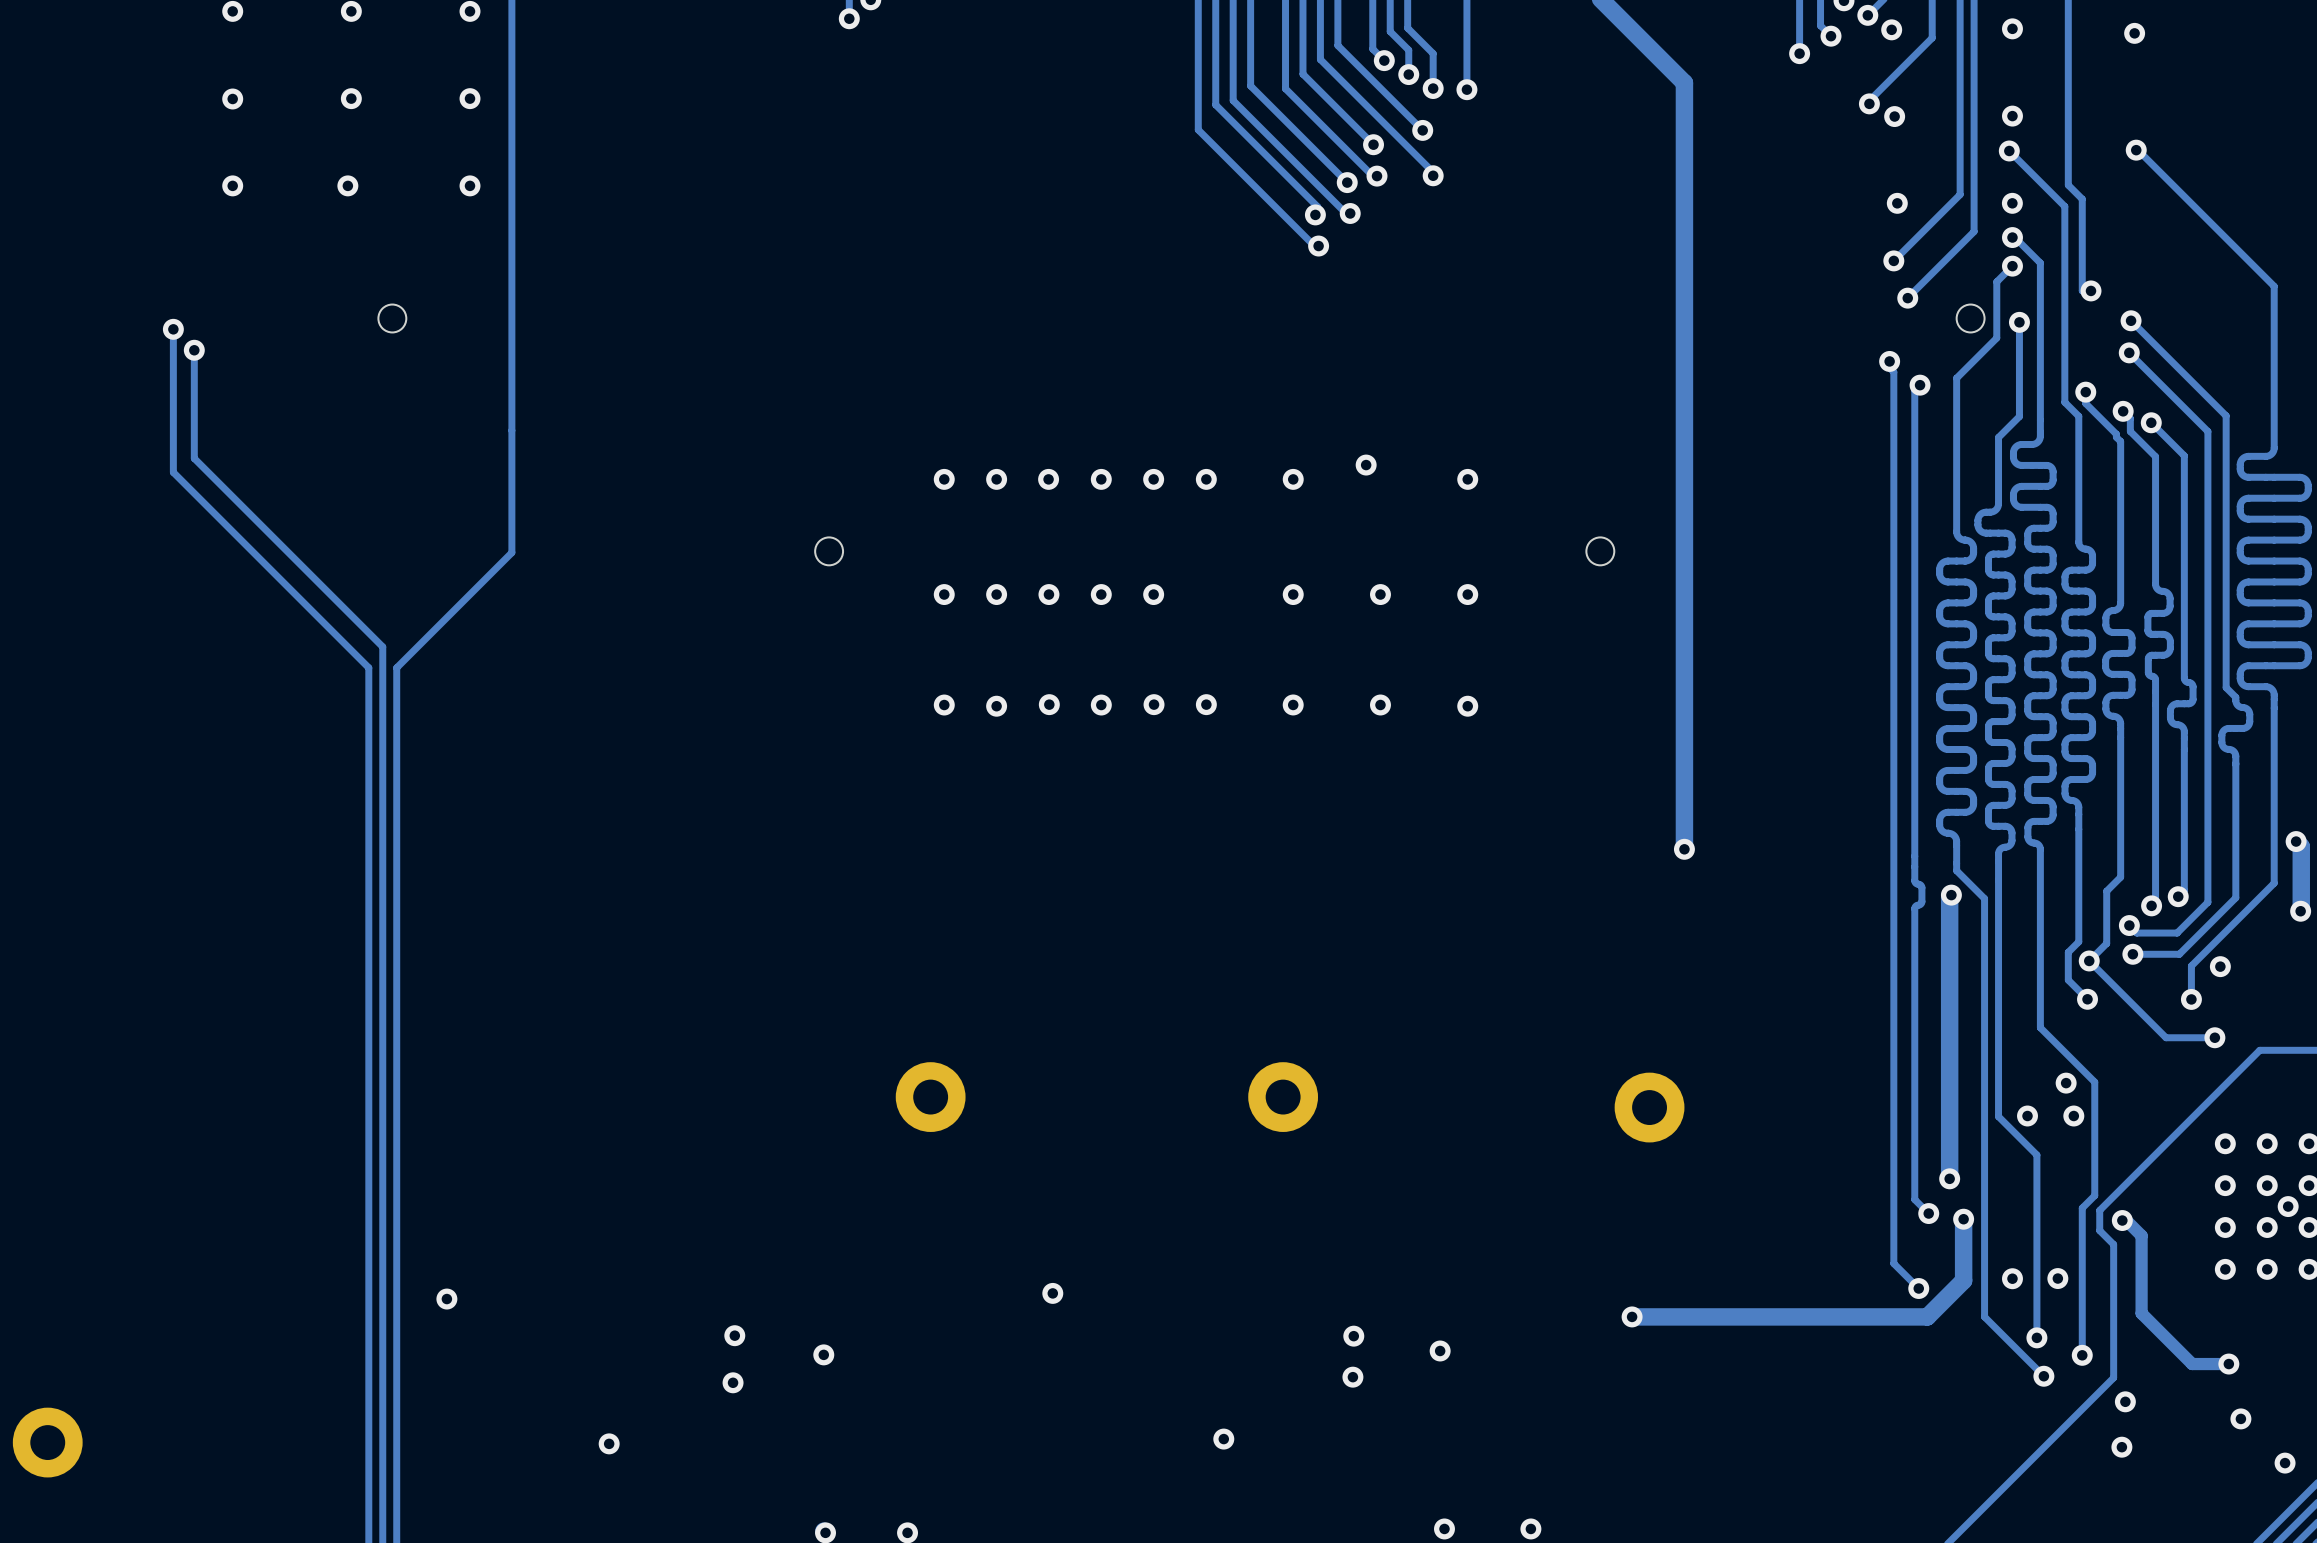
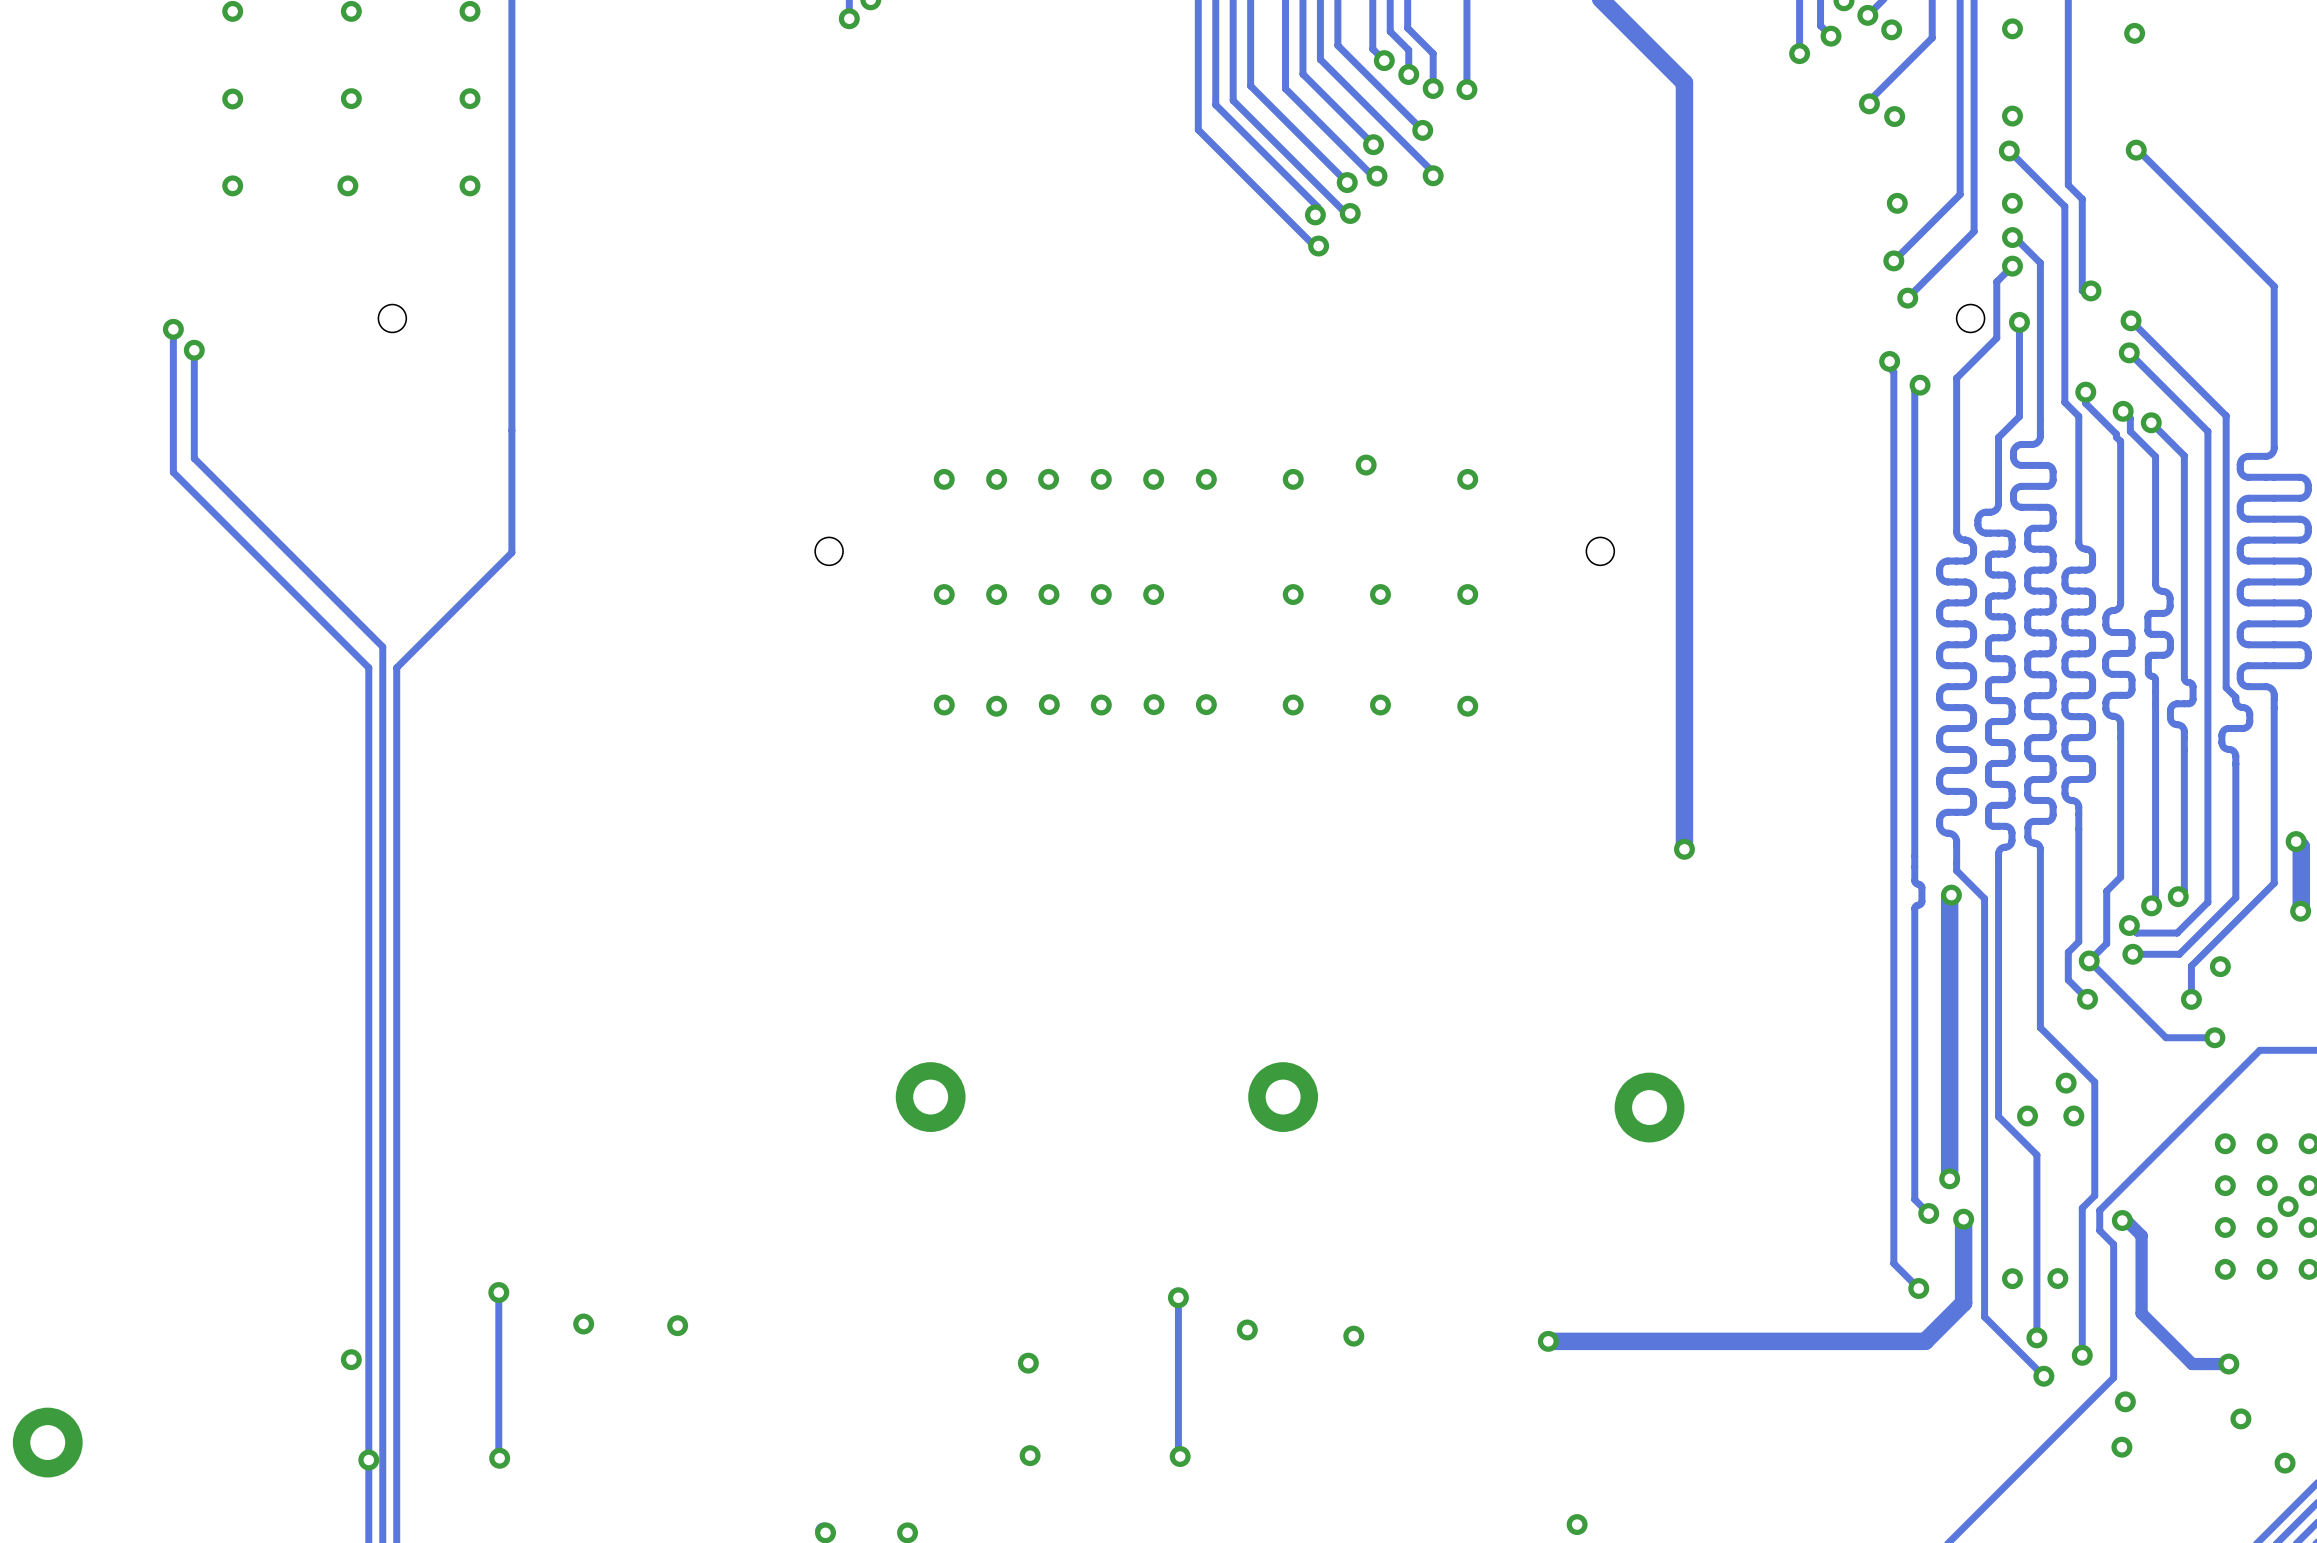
track: (1963, 1280) (1927, 1316) (1632, 1316) -> (1963, 1280) (1963, 1302) (1925, 1341) (1548, 1341)
track: none -> (498, 1292) (499, 1458)
via: (1052, 1293) -> none
track: none -> (1178, 1297) (1179, 1456)
via: none -> (1178, 1297)
via position: (446, 1299) -> (498, 1292)
via: (1632, 1316) -> none
via: none -> (583, 1324)
via: none -> (677, 1325)
via: none -> (1247, 1329)
via: (734, 1335) -> none
via: none -> (1548, 1341)
via: (1440, 1350) -> none
via: (823, 1354) -> none
via: none -> (351, 1359)
via: none -> (1028, 1363)
via: (1352, 1377) -> none
via: (733, 1382) -> none
via position: (1223, 1439) -> (1180, 1456)
via: (609, 1443) -> none
via: none -> (1030, 1455)
via: none -> (499, 1458)
via: none -> (368, 1460)
via: (1444, 1528) -> none
via position: (1530, 1528) -> (1577, 1524)

